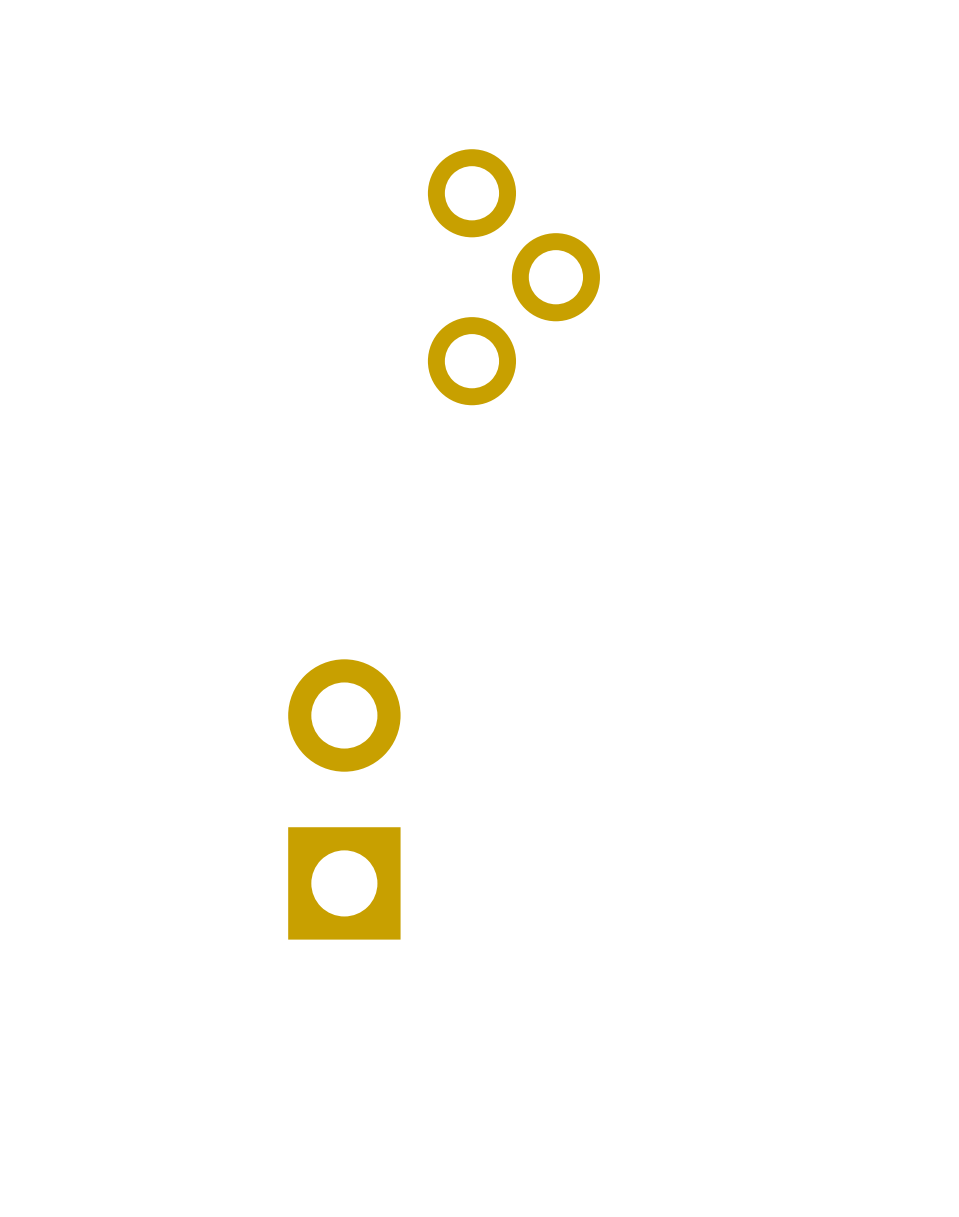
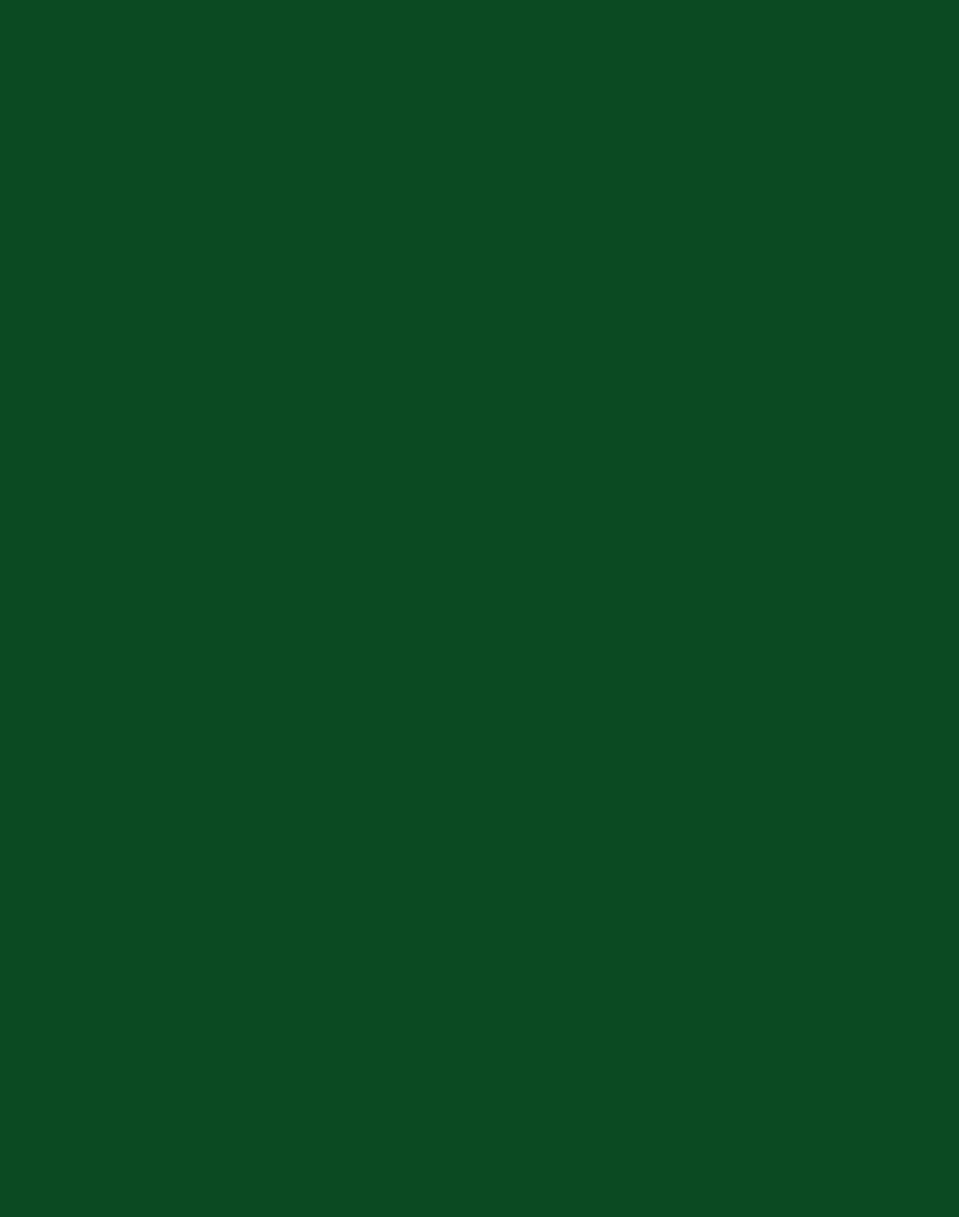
part: (513, 277) -> none
part: (344, 799) -> none

